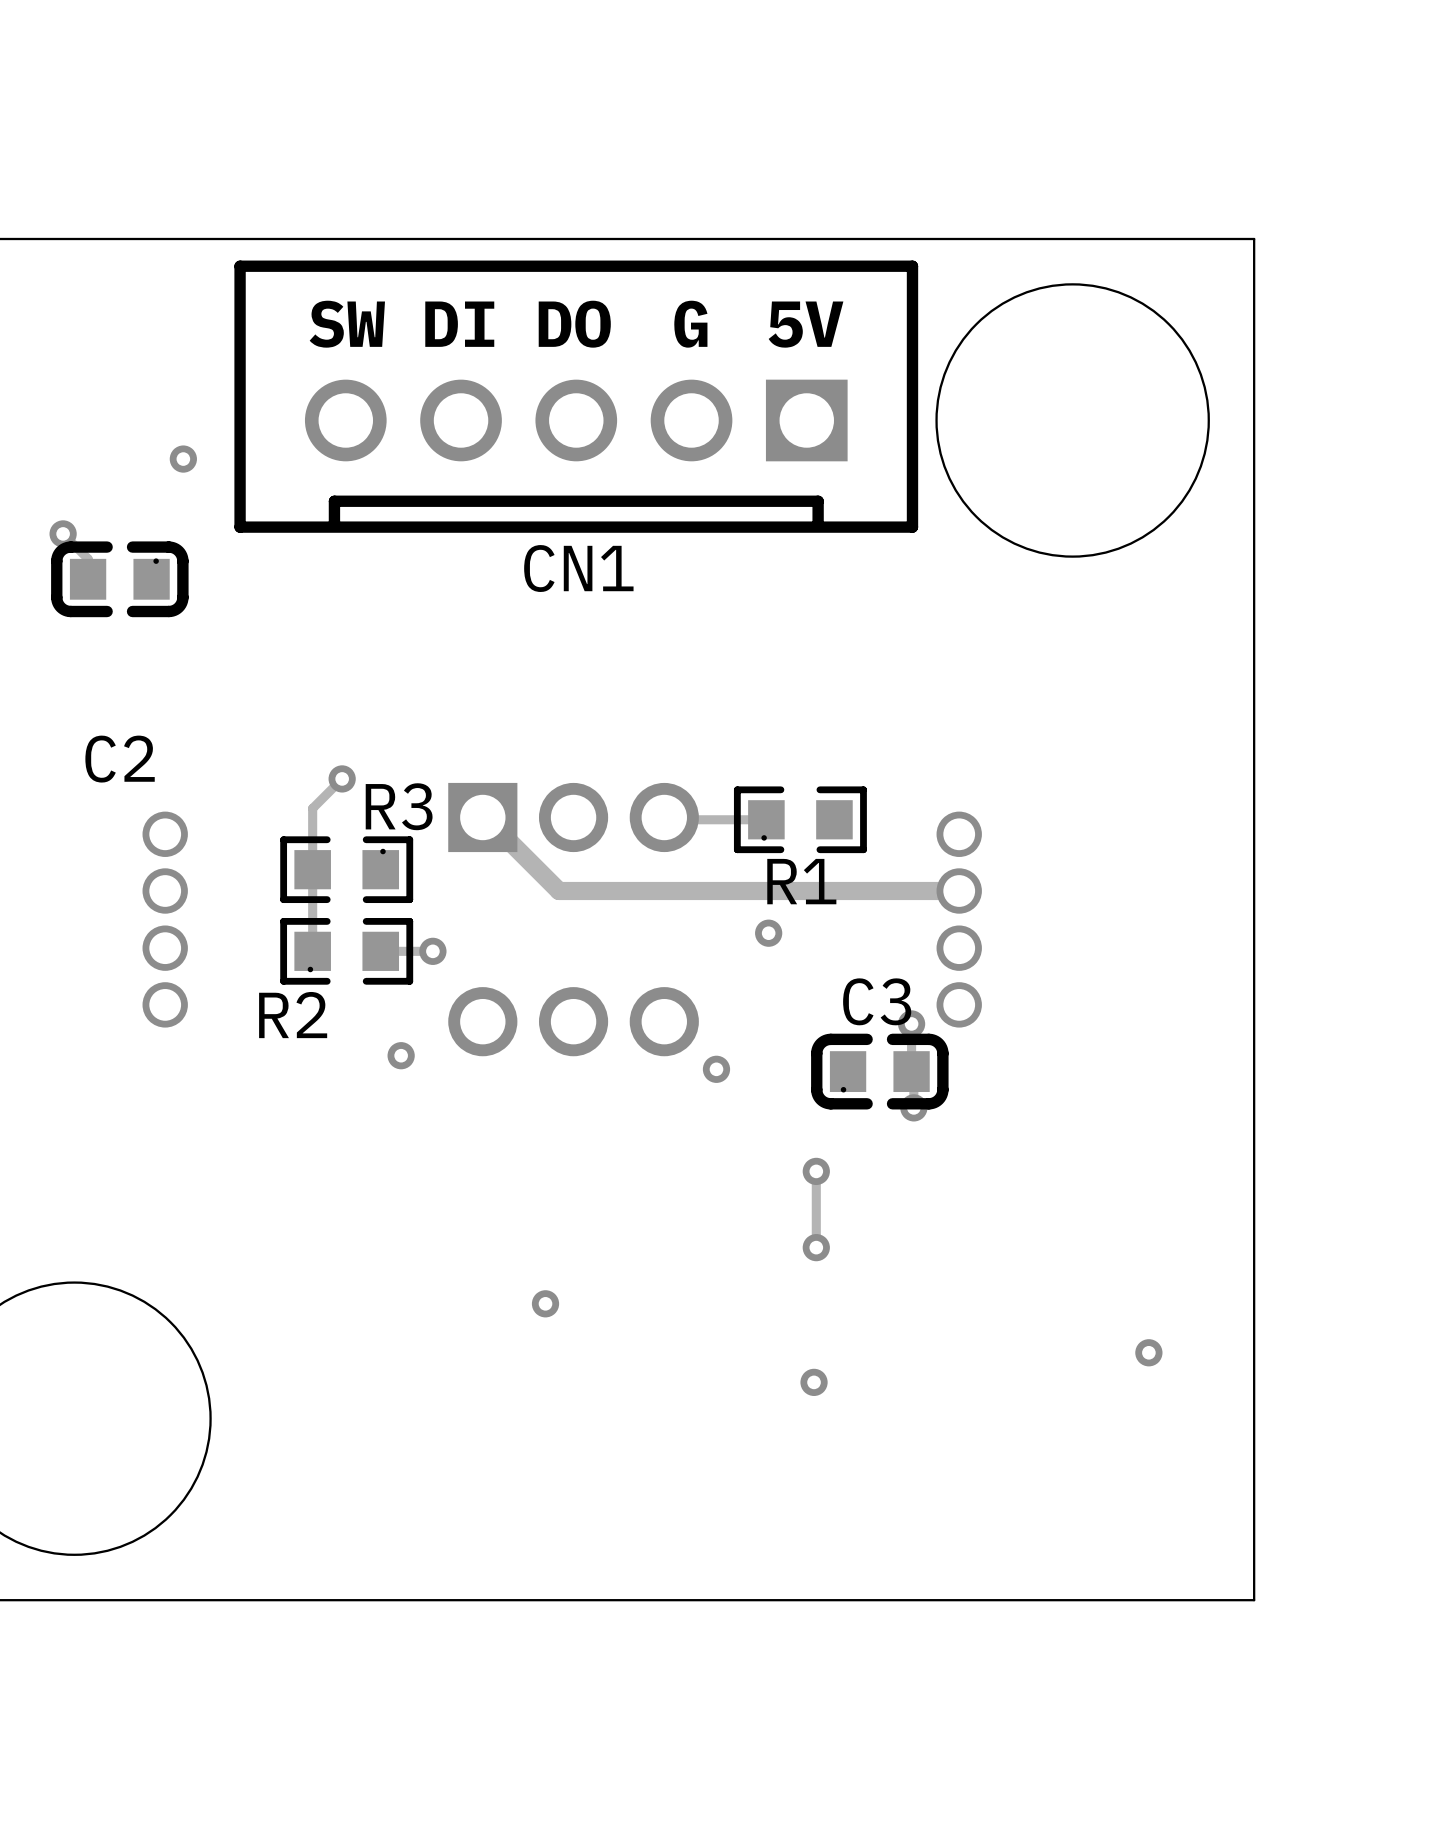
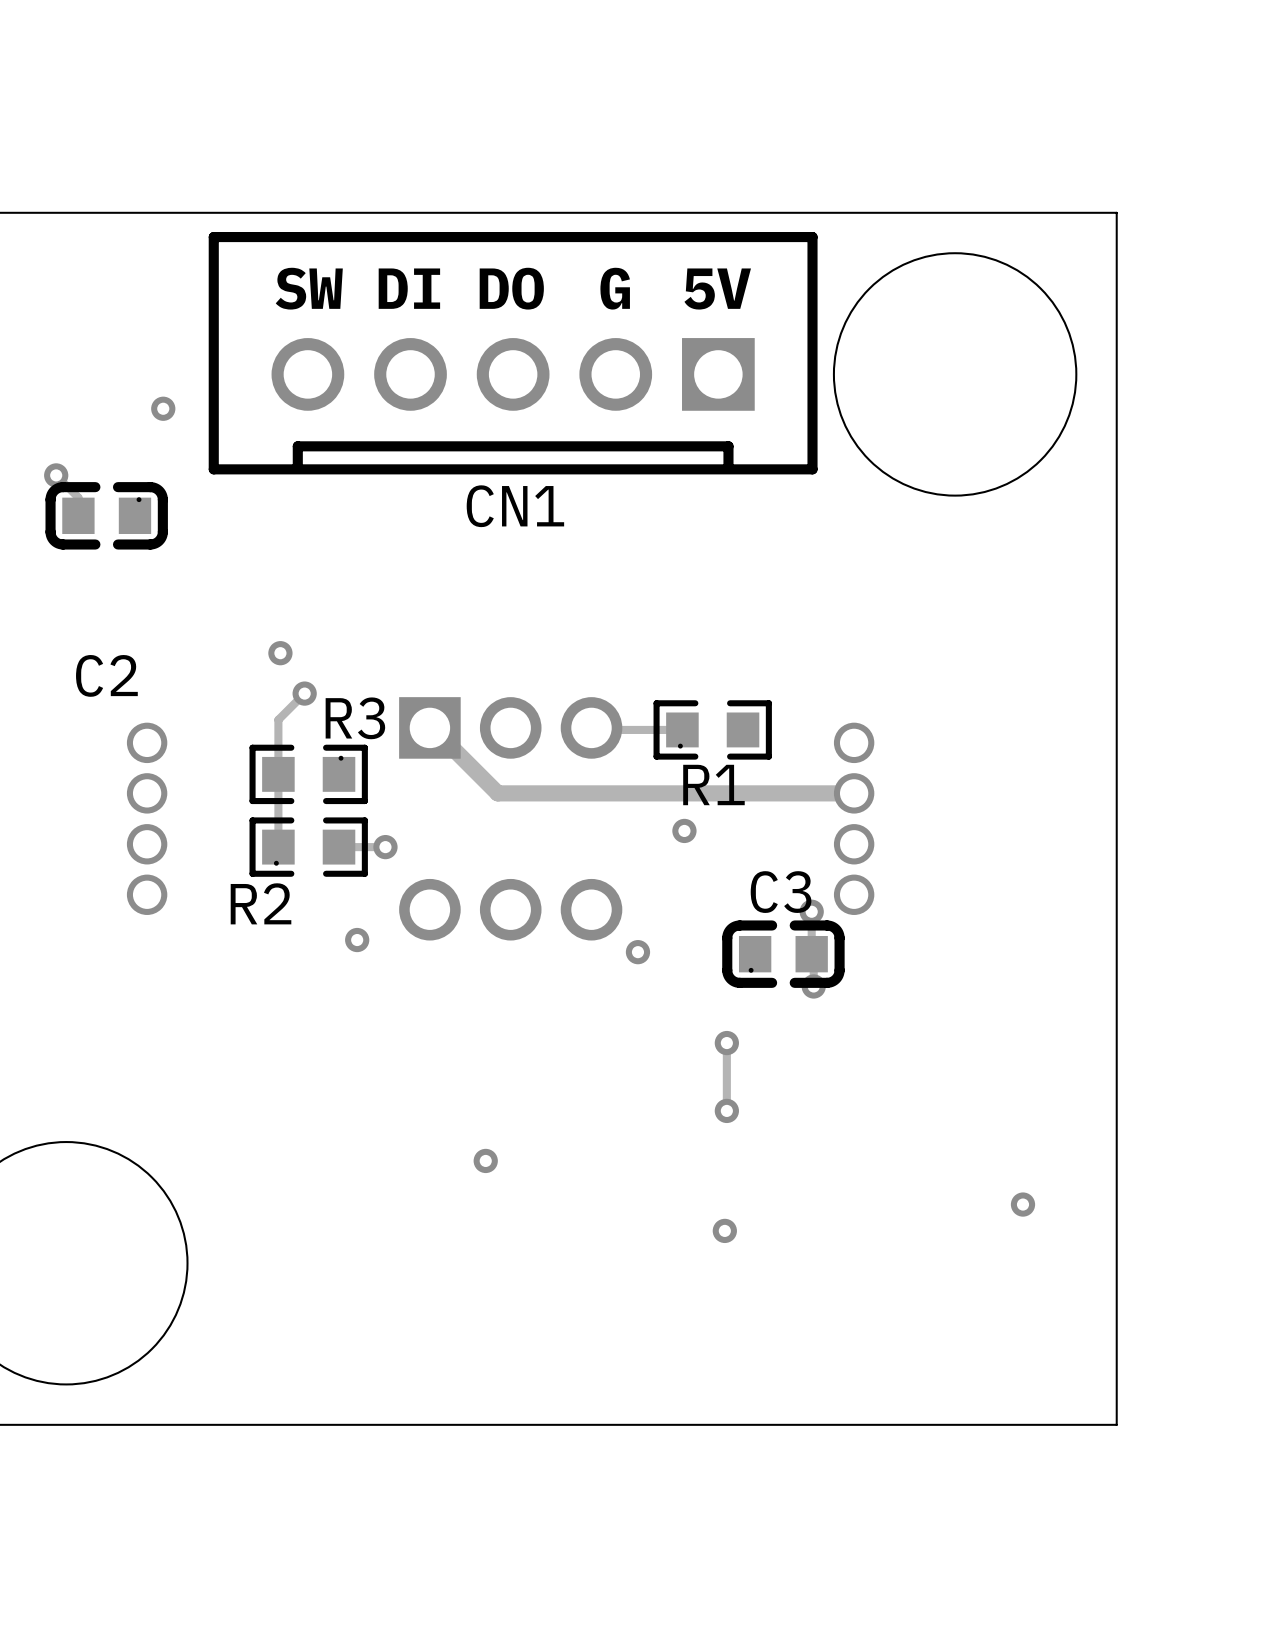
via: none -> (280, 653)

